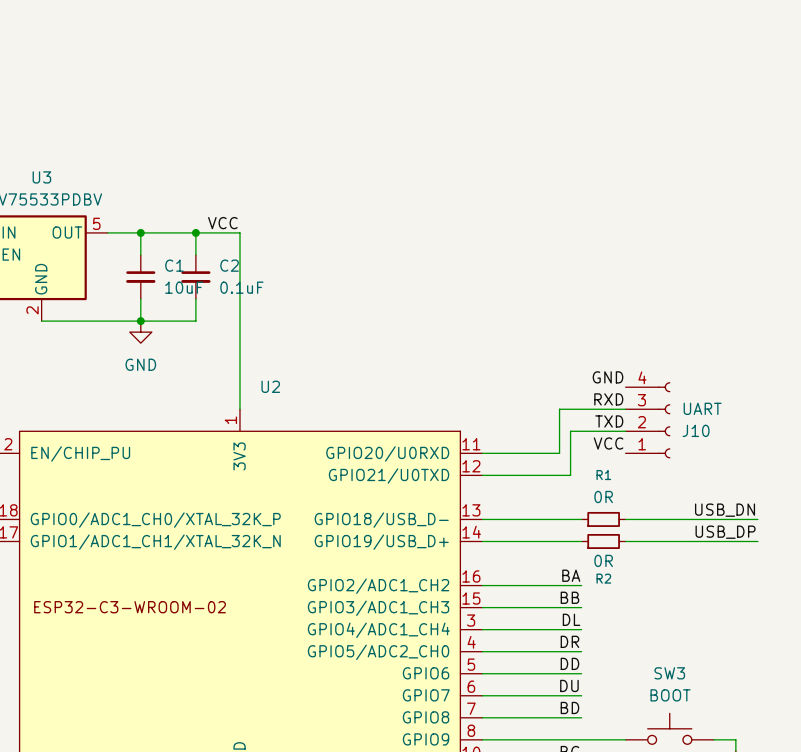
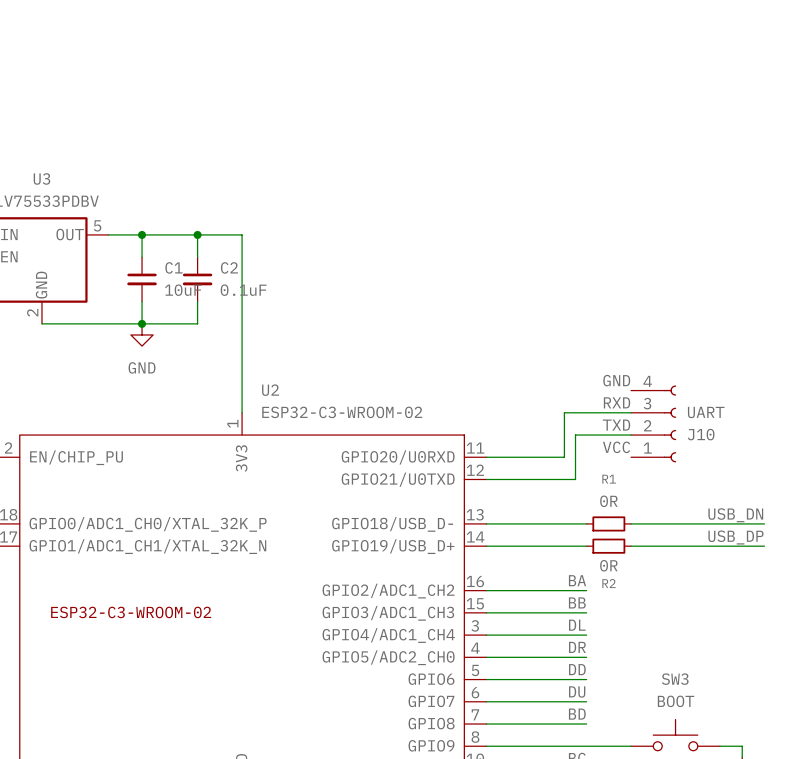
label: VCC (222, 223) -> none
U2 value: none -> ESP32-C3-WROOM-02 (342, 412)

